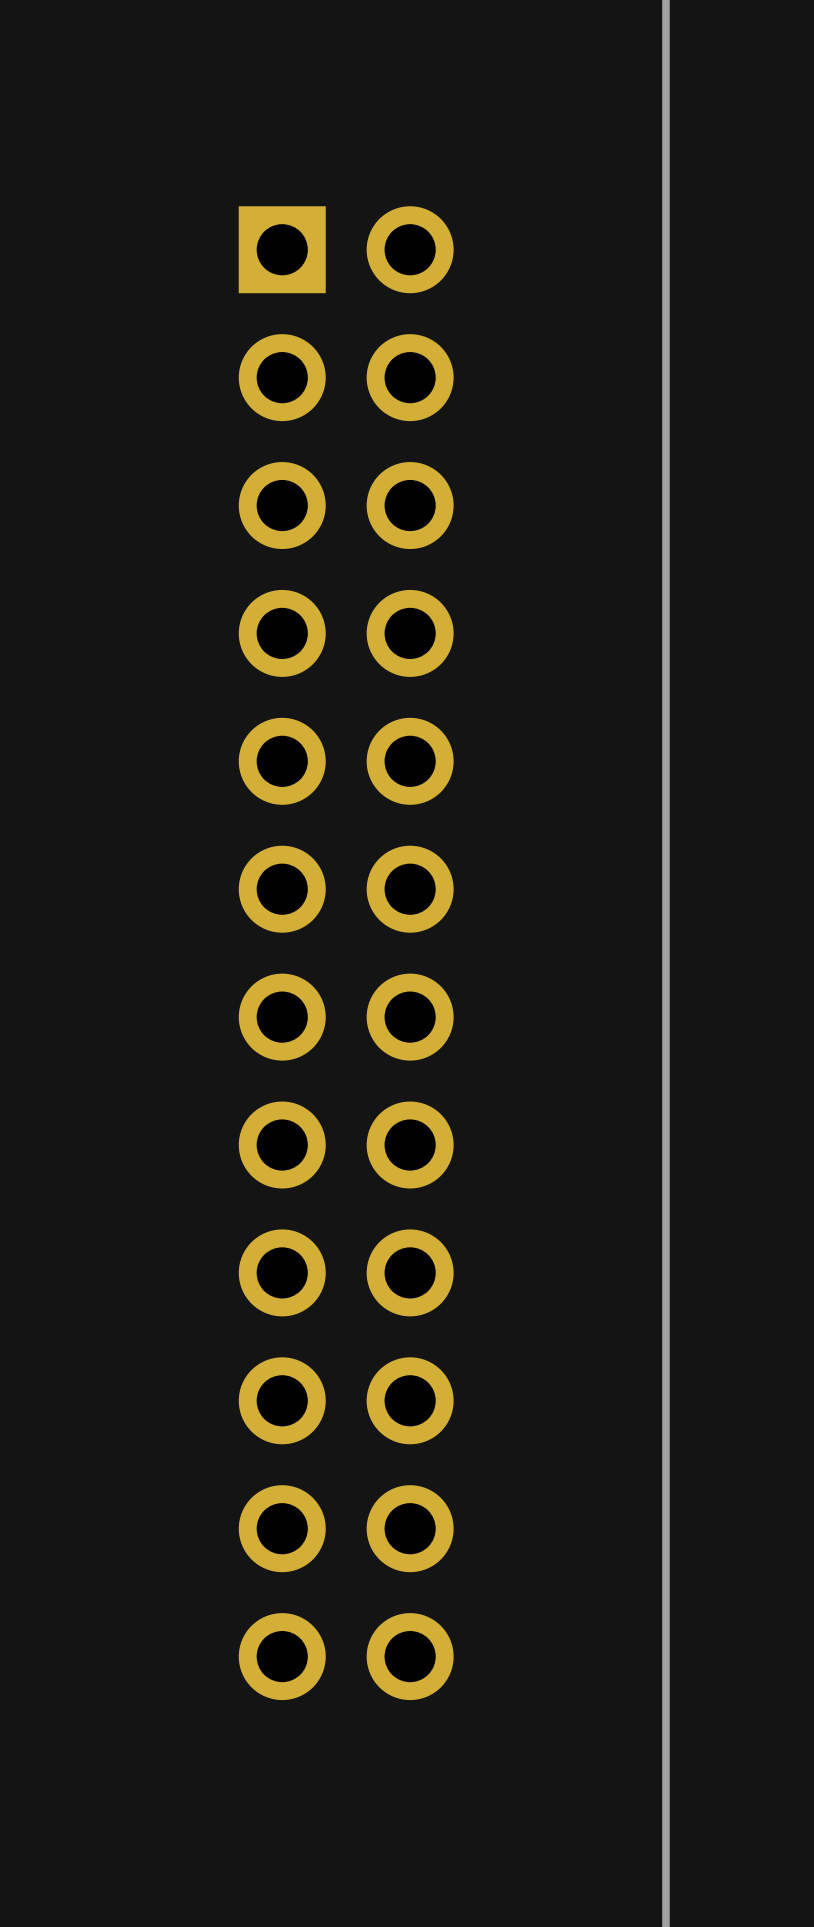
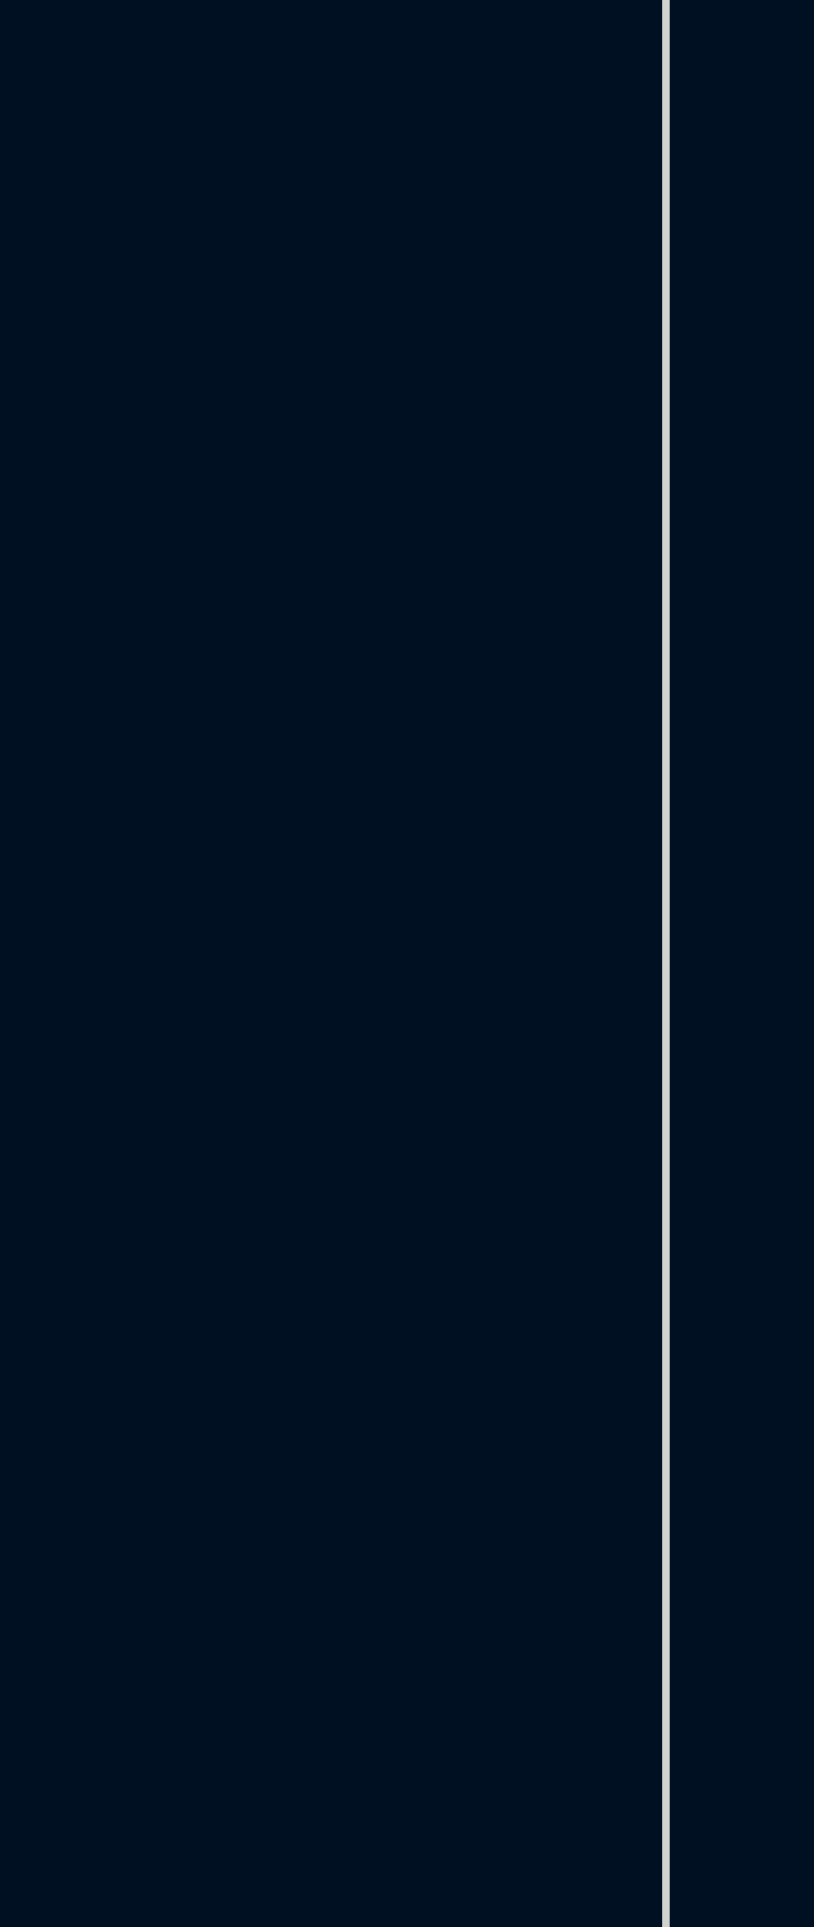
part: (346, 953) -> none

